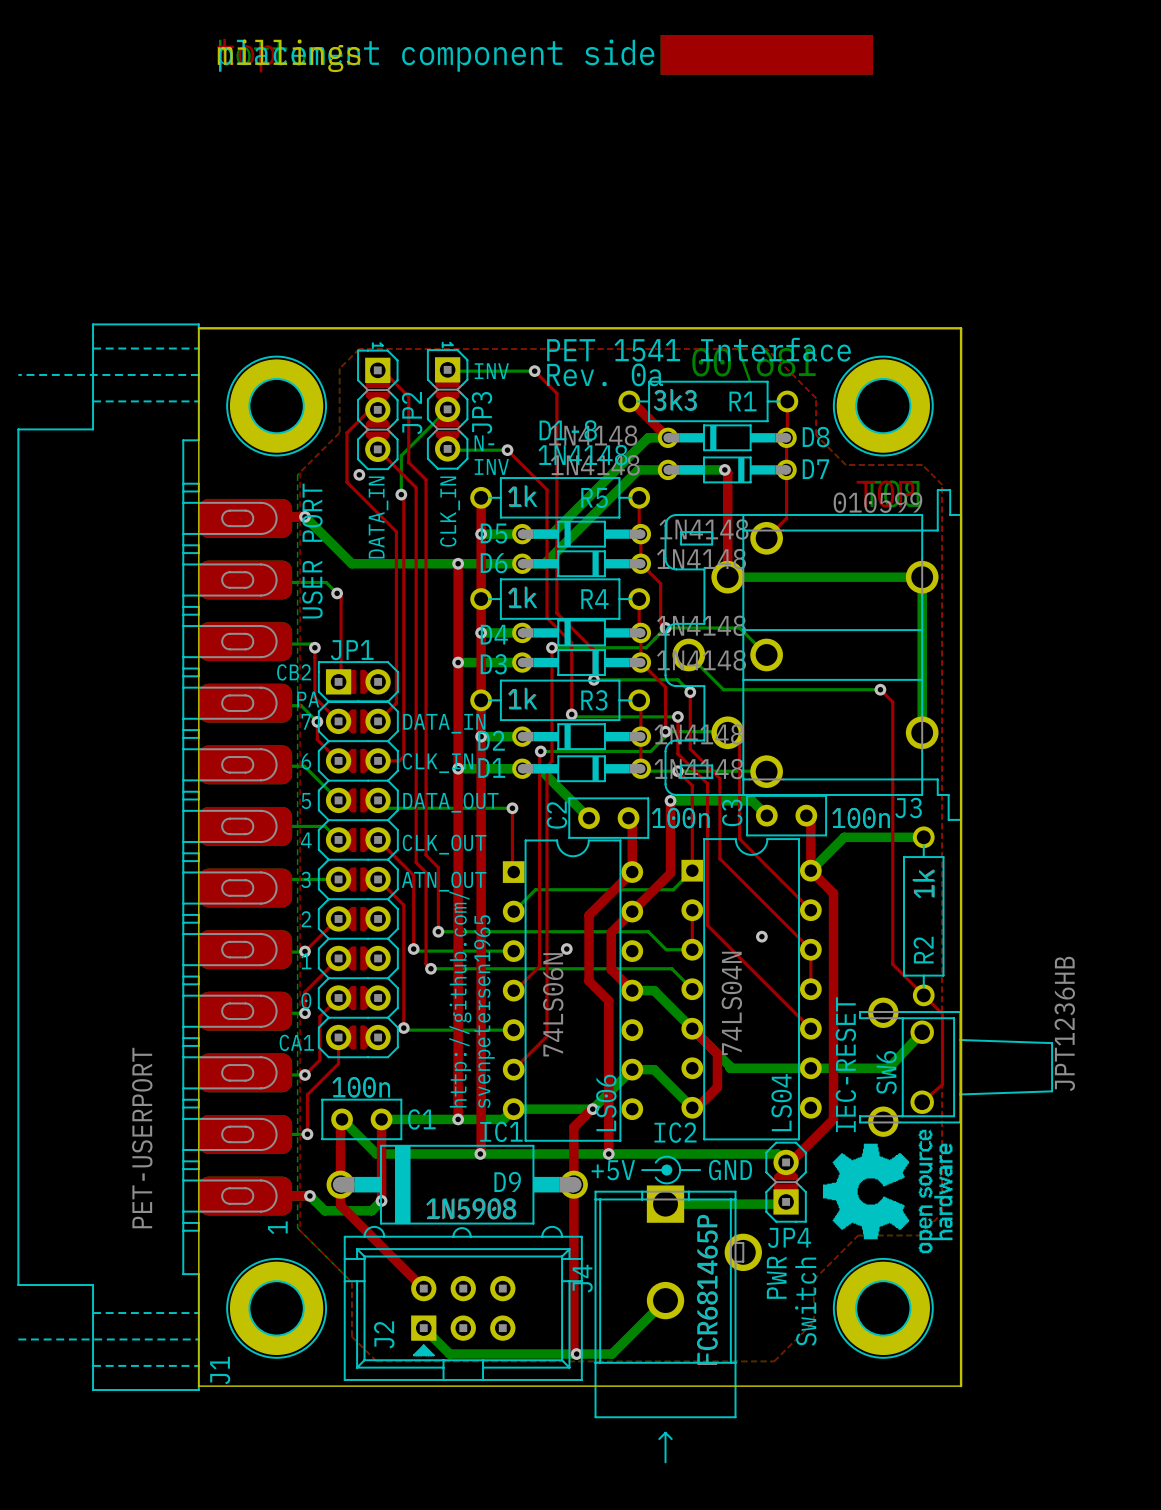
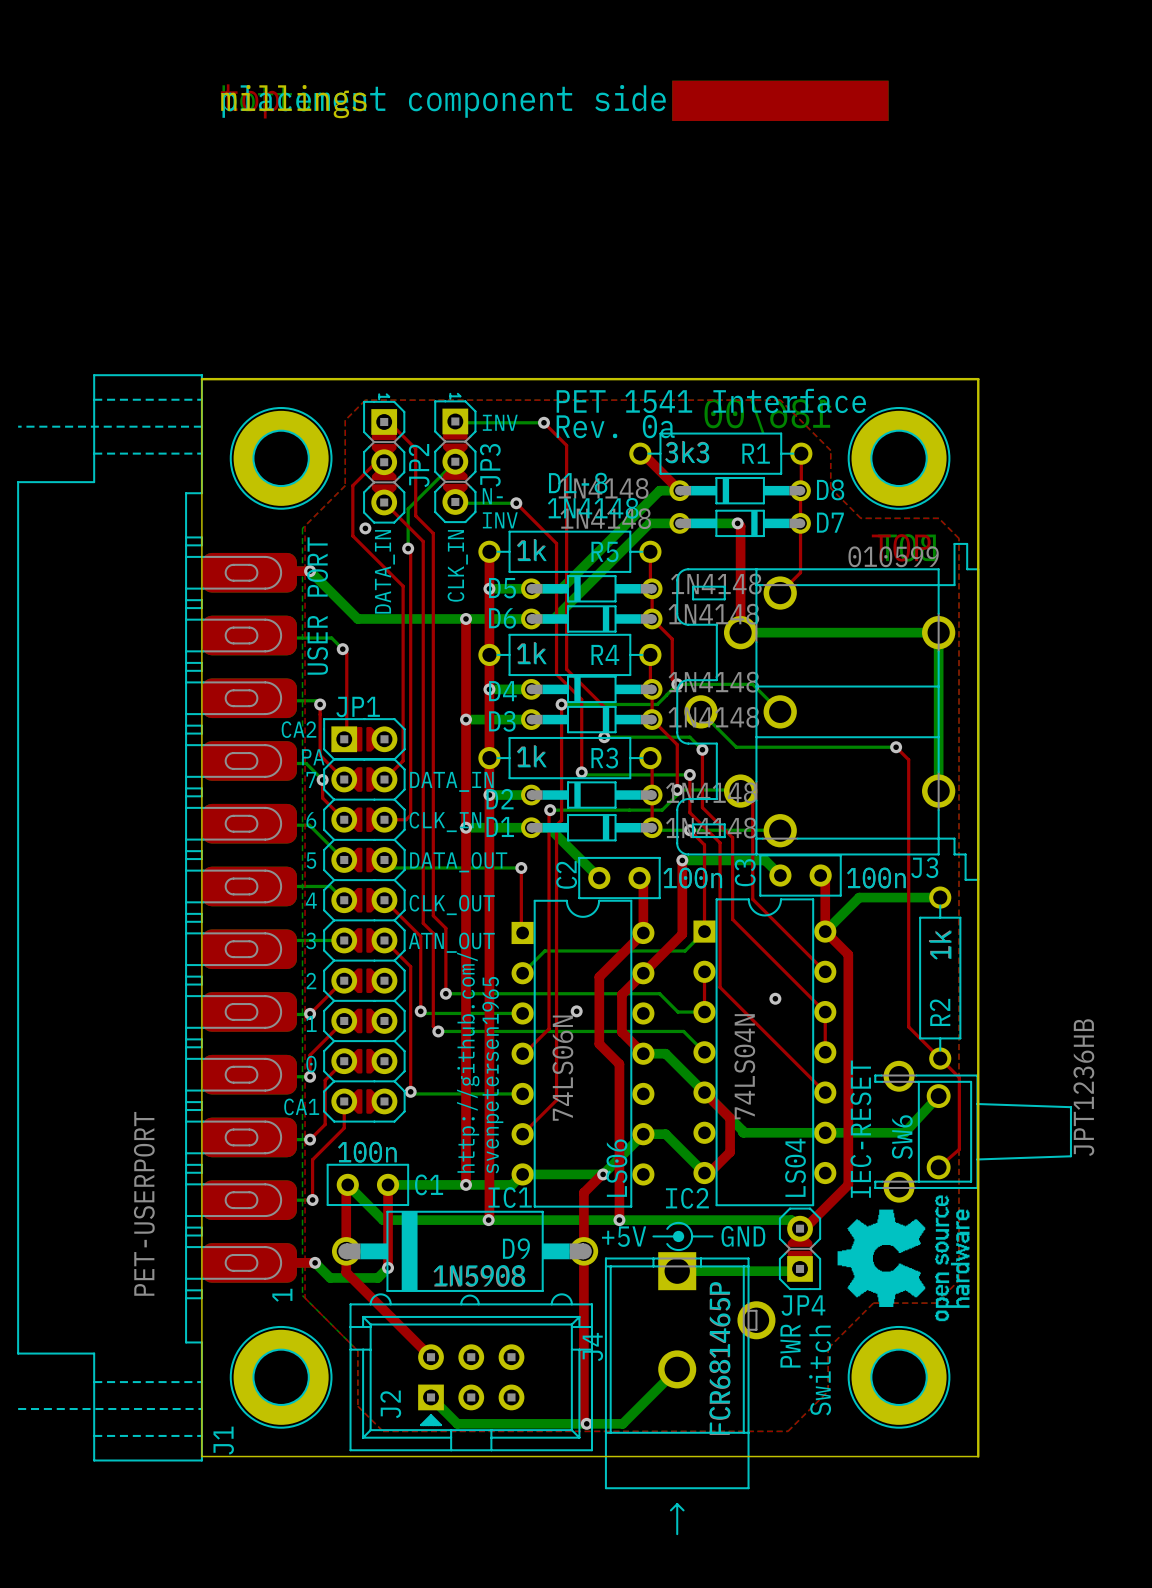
text: CB2 (294, 672) -> CA2 (299, 729)

